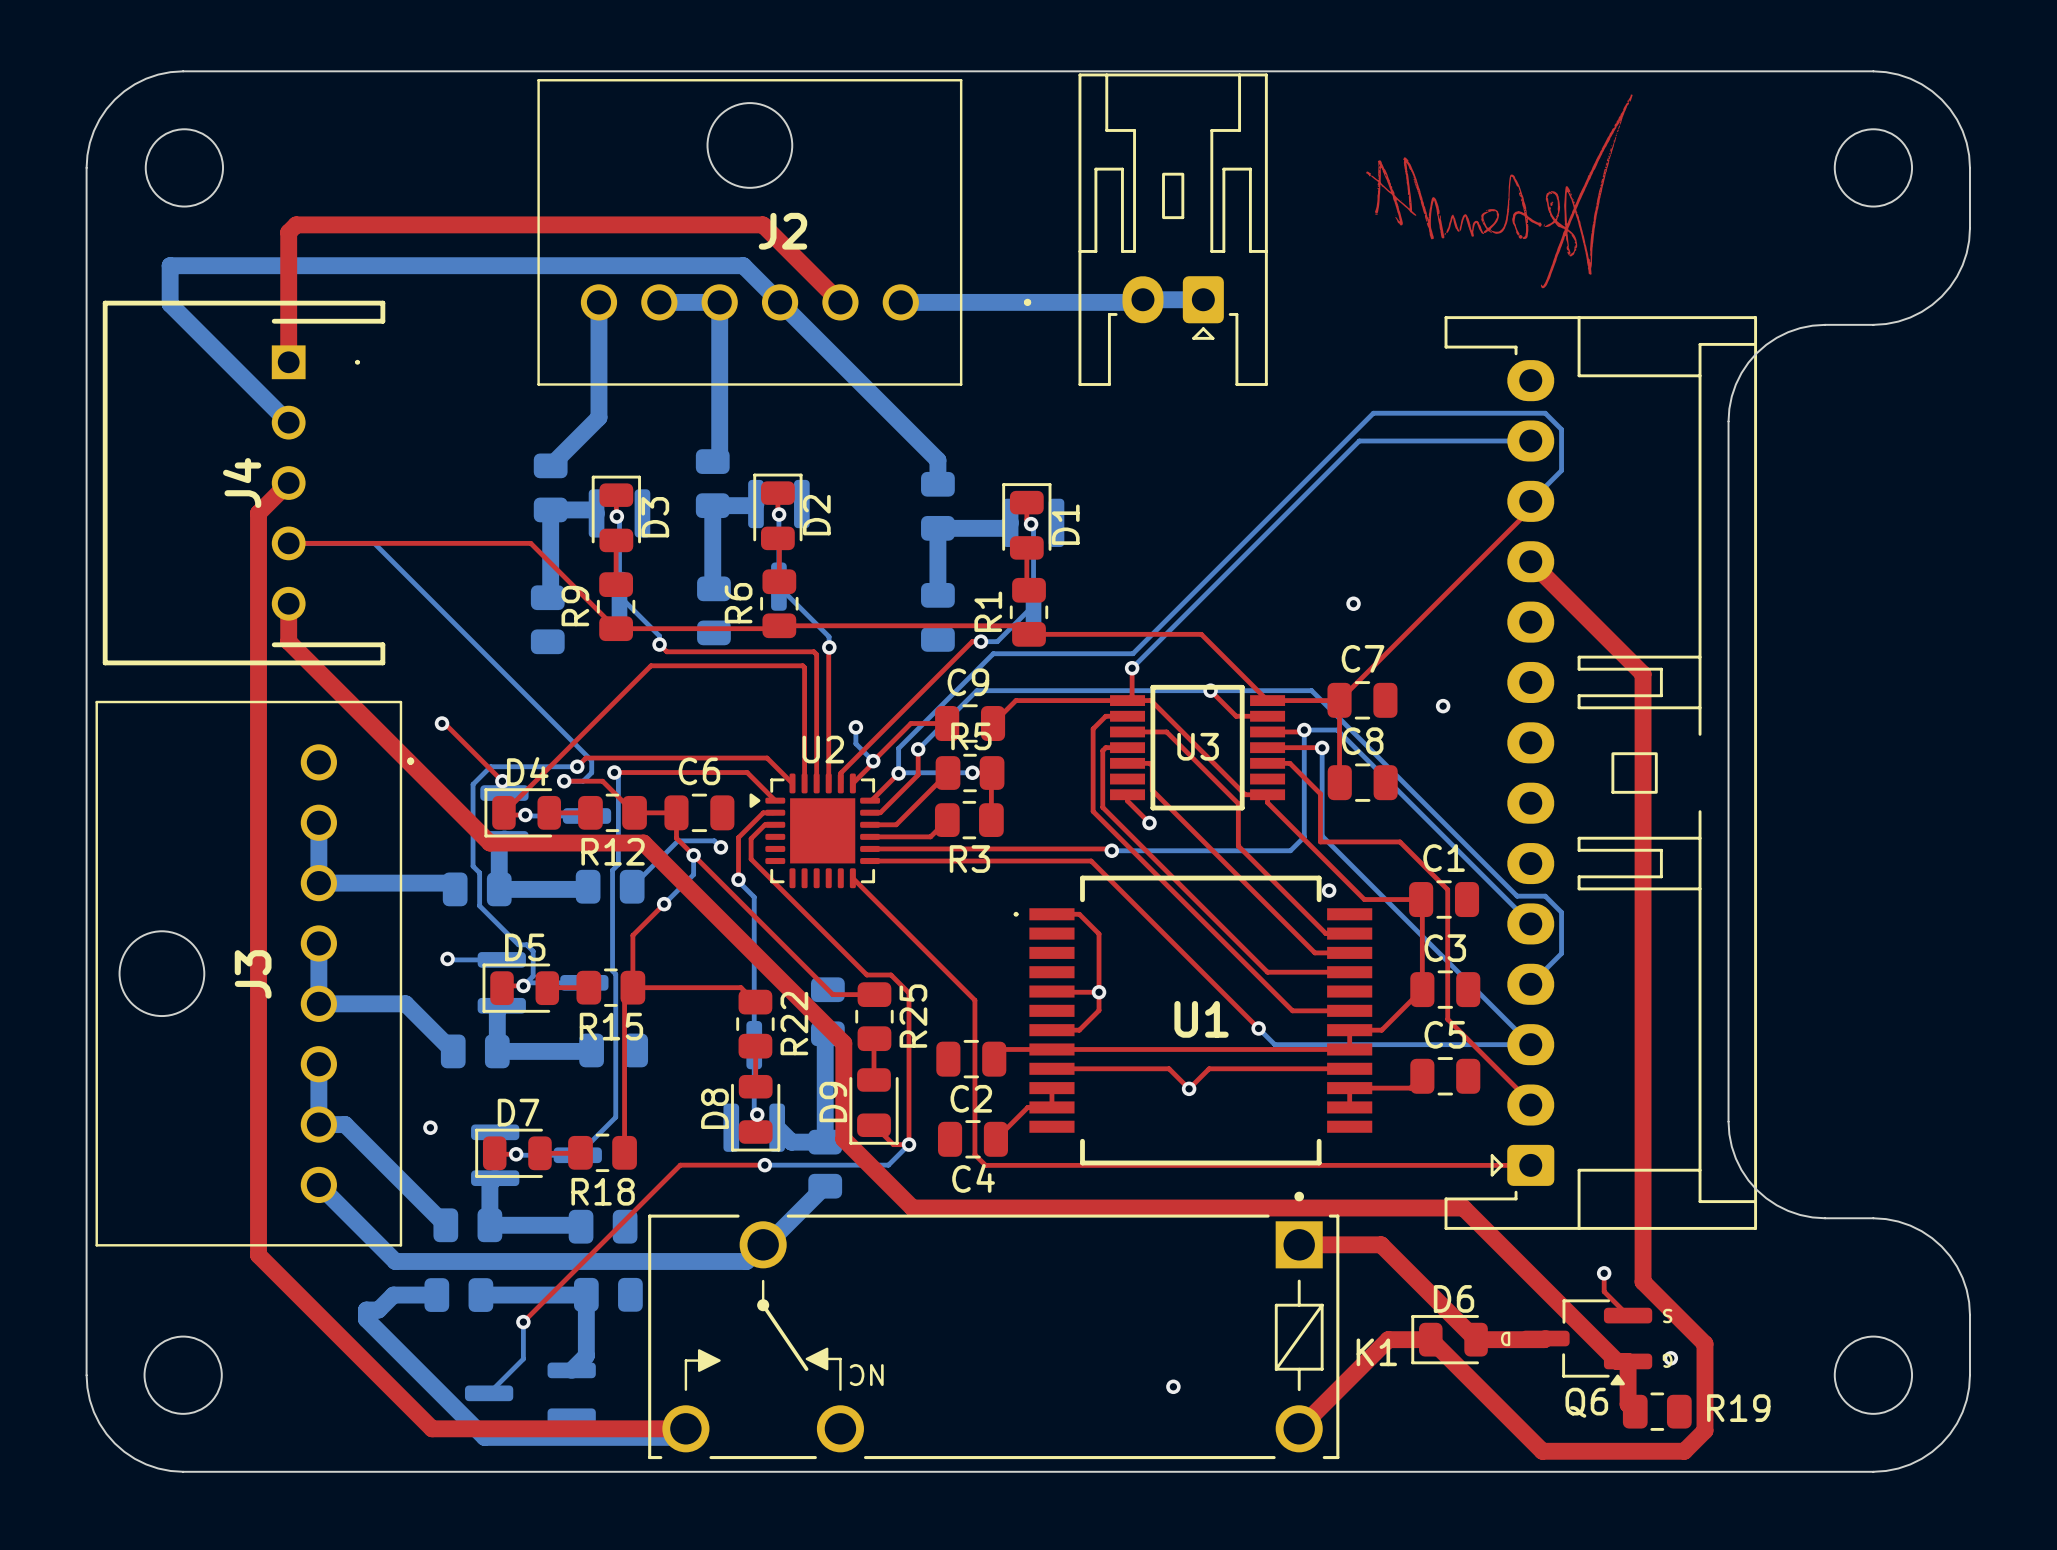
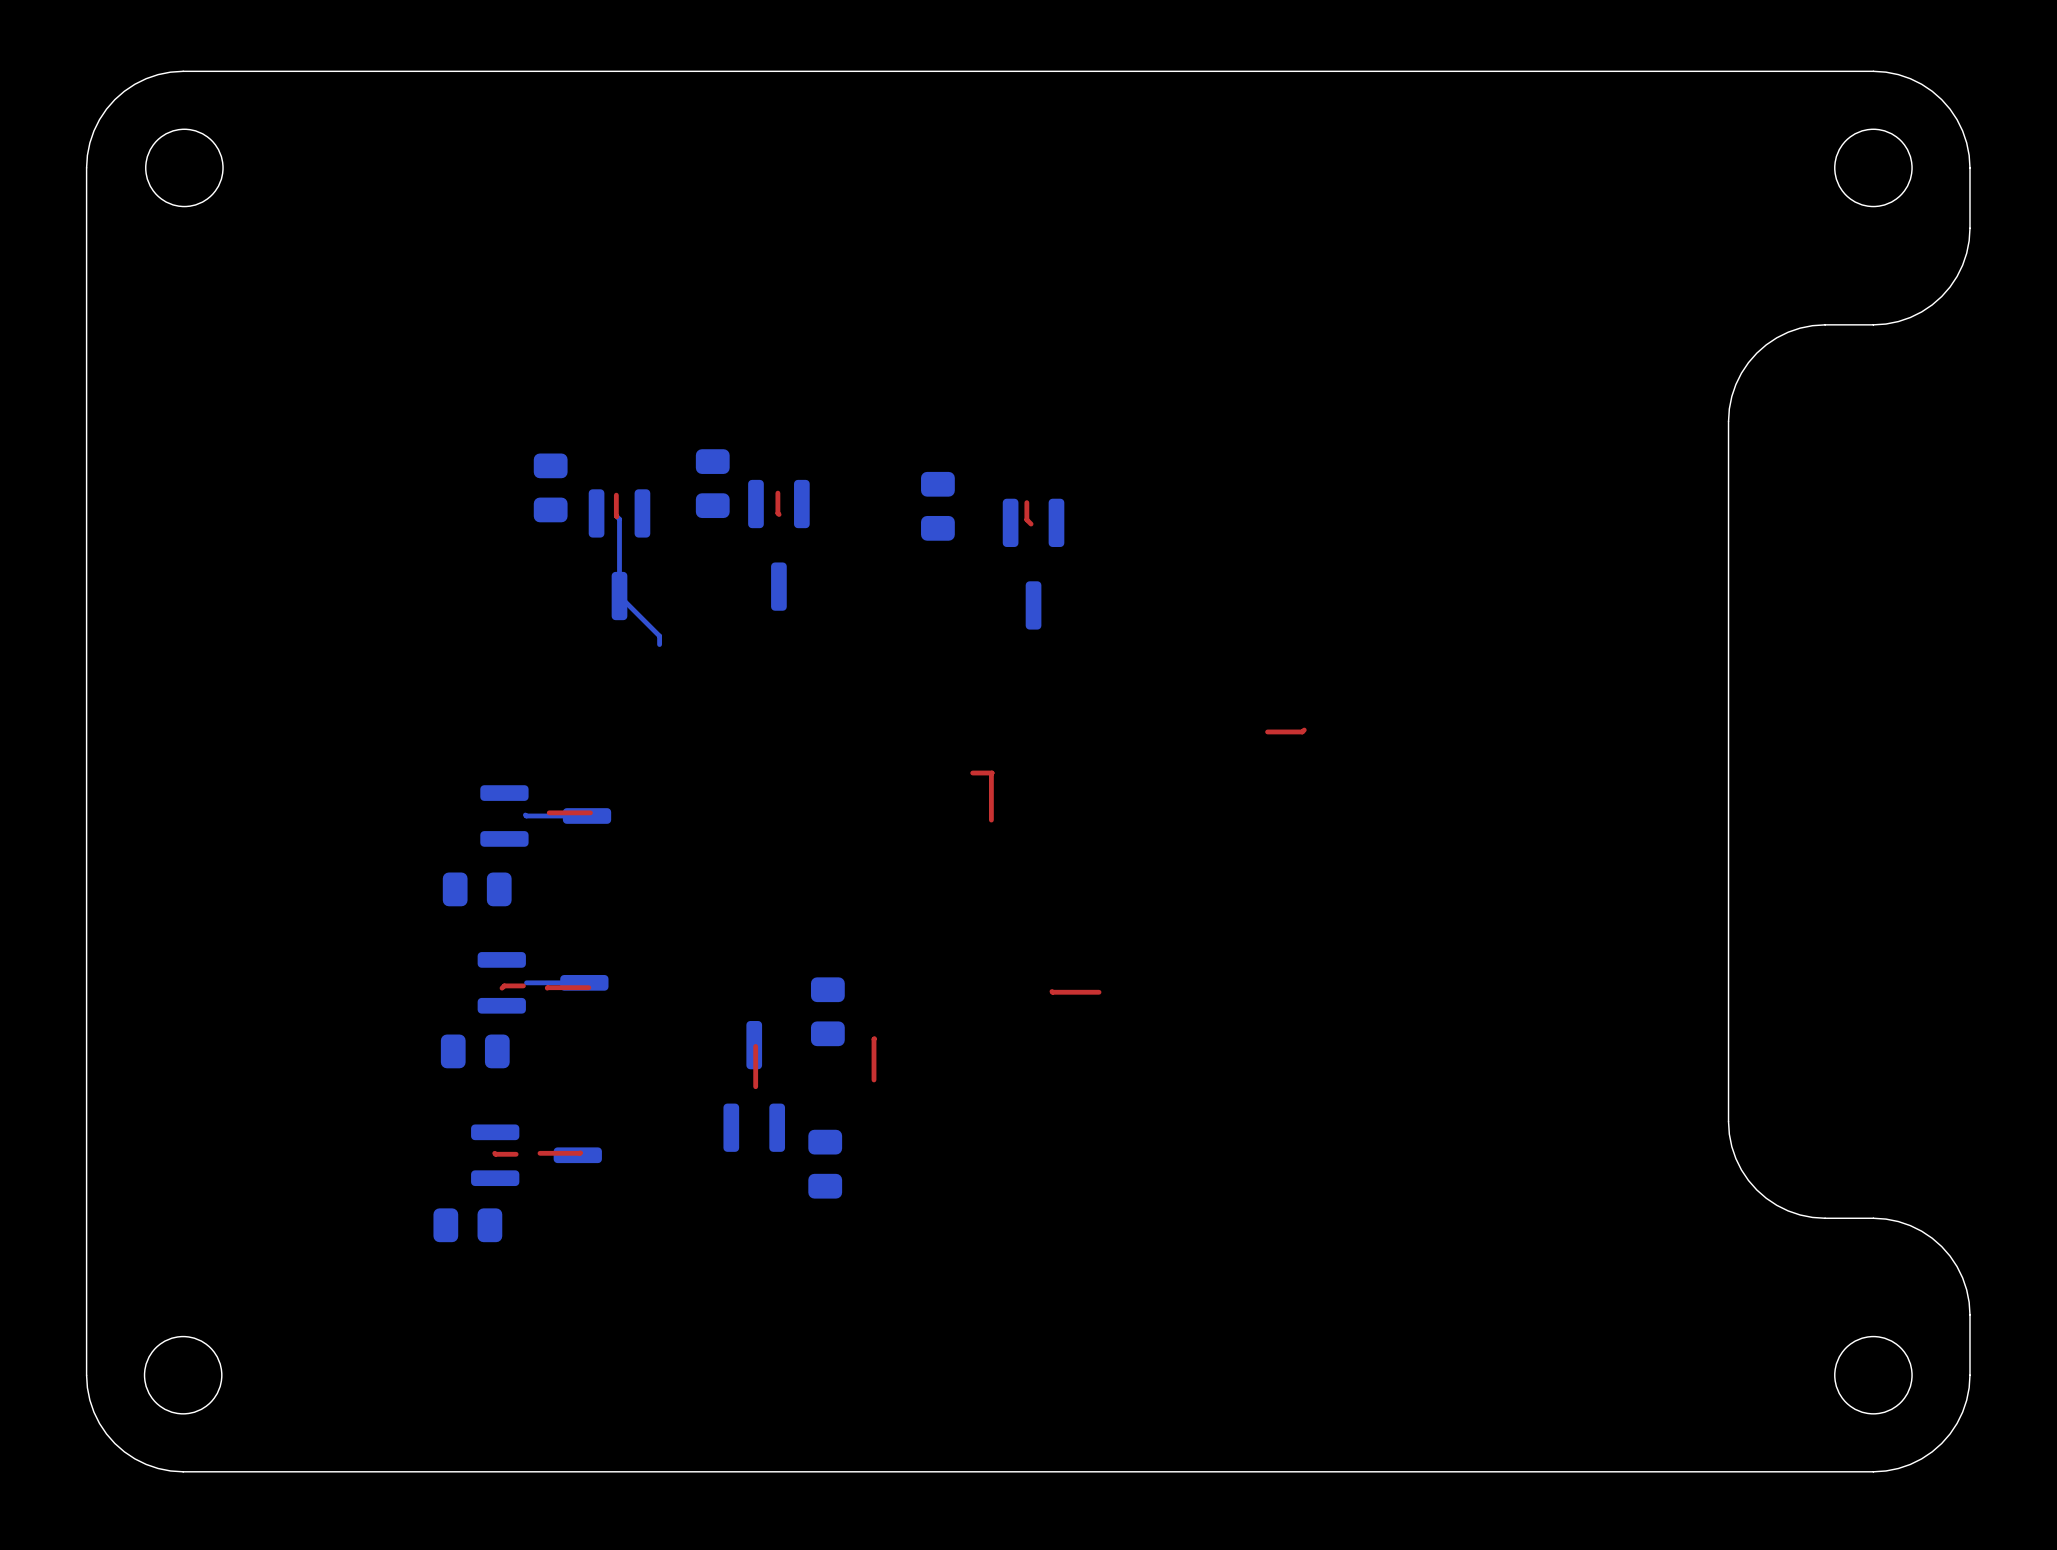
drawing: [1366, 94, 1633, 289] -> none
part: (1173, 229) -> none
J2: (784, 232) -> none
bottom track: (1203, 299) (1142, 299) (1140, 302) (900, 302) -> none
bottom track: (598, 302) (598, 417) (550, 465) -> none
bottom track: (659, 302) (719, 302) (719, 454) (712, 461) -> none
top track: (840, 302) (762, 224) (296, 224) (288, 232) (288, 362) -> none
bottom track: (288, 422) (170, 304) (170, 265) (743, 265) (937, 460) (937, 484) -> none
bottom track: (1530, 441) (1359, 441) (1132, 668) -> none
J4: (244, 483) -> none
top track: (288, 483) (258, 513) (258, 1255) (432, 1428) (685, 1428) -> none
top track: (1530, 501) (1530, 509) (1339, 700) (1267, 700) (1201, 634) (1029, 634) (1020, 625) (779, 625) (776, 628) (616, 628) (530, 543) (288, 543) -> none
bottom track: (1530, 501) (1561, 470) (1561, 429) (1545, 413) (1373, 413) (1132, 653) (993, 653) (898, 748) (898, 773) (972, 772) -> none
bottom track: (755, 504) (754, 505) (712, 505) (713, 588) -> none
D2: (777, 511) -> none
bottom track: (596, 513) (593, 509) (550, 509) (550, 594) (547, 597) -> none
D3: (616, 513) -> none
bottom track: (778, 514) (778, 586) (829, 636) (829, 647) -> none
via: (779, 514) -> none
via: (616, 516) -> none
D1: (1026, 521) -> none
bottom track: (1010, 522) (1005, 528) (937, 528) (937, 595) -> none
bottom track: (1031, 524) (1033, 526) (1033, 605) (997, 641) (980, 641) -> none
via: (1031, 524) -> none
top track: (777, 538) (779, 581) -> none
top track: (616, 540) (616, 584) -> none
bottom track: (288, 543) (374, 543) (591, 760) (591, 772) (583, 781) (564, 781) -> none
top track: (1026, 547) (1026, 588) (1029, 590) -> none
top track: (1530, 561) (1643, 674) (1643, 1281) (1704, 1343) (1704, 1430) (1684, 1451) (1542, 1451) (1430, 1339) (1388, 1339) (1299, 1428) -> none
top track: (288, 603) (288, 641) (489, 843) (643, 843) (843, 1043) (843, 1139) (912, 1208) (1463, 1208) (1617, 1361) (1628, 1361) (1628, 1404) (1635, 1411) -> none
R6: (779, 603) -> none
via: (1353, 603) -> none
R9: (616, 606) -> none
part: (713, 610) -> none
R1: (1029, 612) -> none
part: (937, 617) -> none
part: (547, 619) -> none
top track: (980, 641) (972, 641) (840, 773) (840, 783) -> none
via: (980, 641) -> none
top track: (659, 644) (666, 651) (813, 651) (816, 654) (816, 783) -> none
via: (659, 644) -> none
top track: (829, 647) (828, 783) -> none
via: (829, 647) -> none
top track: (1132, 668) (1132, 695) (1127, 700) -> none
via: (1132, 668) -> none
top track: (1210, 690) (1236, 716) (1267, 716) -> none
via: (1210, 690) -> none
top track: (1339, 700) (1339, 782) -> none
C7: (1362, 700) -> none
via: (1443, 706) -> none
top track: (1127, 716) (1105, 716) (1093, 728) (1093, 811) (1292, 1010) (1349, 1010) -> none
top track: (442, 723) (444, 723) (502, 781) -> none
via: (442, 723) -> none
top track: (947, 723) (910, 723) (852, 783) -> none
C9: (970, 723) -> none
top track: (993, 723) (1015, 700) (1151, 700) (1245, 794) (1267, 794) (1267, 802) (1364, 899) (1422, 900) (1422, 989) (1381, 1030) (1349, 1030) (1349, 1049) (1003, 1049) (994, 1059) -> none
bottom track: (855, 727) (855, 743) (873, 761) -> none
via: (855, 727) -> none
via: (1304, 730) -> none
top track: (1127, 731) (1166, 731) (1238, 803) (1238, 846) (1325, 933) (1349, 933) -> none
top track: (1127, 747) (1105, 747) (1102, 750) (1102, 807) (1267, 972) (1349, 972) -> none
U3: (1197, 747) -> none
top track: (1267, 747) (1321, 747) -> none
bottom track: (1322, 747) (1322, 836) (1530, 1044) (1274, 1044) (1258, 1028) -> none
via: (1322, 747) -> none
top track: (918, 749) (918, 774) (880, 812) (870, 812) -> none
bottom track: (918, 749) (976, 690) (1311, 690) (1517, 896) (1545, 896) (1561, 912) (1561, 953) (1530, 984) -> none
via: (918, 749) -> none
via: (873, 761) -> none
top track: (1127, 763) (1149, 763) (1152, 765) (1152, 790) (1314, 952) (1349, 952) -> none
top track: (1267, 763) (1289, 763) (1320, 793) (1320, 841) (1400, 841) (1447, 889) (1447, 1019) (1530, 1102) (1530, 1105) -> none
top track: (577, 766) (585, 758) (767, 758) (792, 783) -> none
bottom track: (577, 766) (490, 766) (473, 784) (473, 866) (479, 872) (479, 905) (518, 944) (526, 944) (533, 951) (533, 976) (523, 985) -> none
via: (577, 766) -> none
top track: (614, 772) (747, 772) (775, 800) -> none
bottom track: (614, 772) (618, 776) (618, 864) (612, 870) (612, 970) (615, 974) (615, 1117) (577, 1155) (516, 1154) -> none
via: (614, 772) -> none
via: (972, 772) -> none
top track: (898, 773) (870, 800) -> none
via: (898, 773) -> none
top track: (948, 773) (896, 824) (870, 824) -> none
R5: (970, 773) -> none
part: (1600, 773) -> none
via: (502, 781) -> none
top track: (564, 781) (602, 781) (634, 812) (676, 812) (676, 838) (832, 994) (874, 994) -> none
via: (564, 781) -> none
C8: (1362, 782) -> none
top track: (804, 783) (804, 667) (802, 665) (651, 665) (503, 812) (506, 815) (525, 815) -> none
top track: (1127, 794) (1127, 801) (1149, 822) -> none
D4: (522, 812) -> none
R12: (612, 812) -> none
C6: (699, 812) -> none
top track: (775, 812) (763, 812) (738, 837) (738, 879) -> none
via: (525, 815) -> none
top track: (947, 820) (930, 836) (870, 836) -> none
R3: (969, 820) -> none
bottom track: (318, 822) (318, 883) (448, 883) (455, 889) -> none
via: (1149, 822) -> none
top track: (775, 824) (764, 824) (751, 838) (751, 859) (866, 974) (891, 974) (909, 992) (909, 1144) (893, 1144) (873, 1125) -> none
U2: (814, 830) -> none
bottom track: (504, 838) (499, 844) (499, 889) (585, 889) (588, 886) -> none
bottom track: (720, 847) (714, 840) (678, 840) (632, 886) -> none
via: (720, 847) -> none
top track: (870, 848) (1110, 848) (1111, 850) -> none
bottom track: (1111, 850) (1290, 850) (1304, 837) (1304, 730) (1337, 730) (1530, 923) -> none
via: (1111, 850) -> none
bottom track: (693, 855) (693, 874) (664, 904) -> none
via: (693, 855) -> none
top track: (870, 861) (1091, 861) (1258, 1028) -> none
top track: (852, 878) (974, 1000) (974, 1154) (985, 1165) (1530, 1165) -> none
bottom track: (738, 879) (754, 897) (754, 1111) (757, 1114) -> none
via: (738, 879) -> none
part: (610, 886) -> none
via: (1329, 890) -> none
C1: (1444, 899) -> none
top track: (664, 904) (632, 935) (632, 987) -> none
via: (664, 904) -> none
top track: (1051, 914) (1079, 914) (1099, 933) (1099, 1010) (1079, 1030) (1051, 1030) -> none
bottom track: (318, 943) (318, 1003) (405, 1003) (453, 1051) -> none
bottom track: (447, 958) (501, 959) -> none
via: (447, 958) -> none
J3: (254, 973) -> none
via: (523, 985) -> none
R15: (610, 987) -> none
top track: (632, 987) (624, 996) (624, 1152) -> none
top track: (632, 987) (741, 987) (755, 1002) -> none
D5: (520, 988) -> none
C3: (1445, 989) -> none
via: (1099, 992) -> none
bottom track: (501, 1005) (497, 1010) (497, 1051) (591, 1050) -> none
R25: (874, 1016) -> none
U1: (1192, 1020) -> none
R22: (755, 1024) -> none
via: (1258, 1028) -> none
bottom track: (827, 1033) (825, 1036) (825, 1142) (791, 1142) (777, 1127) -> none
part: (613, 1050) -> none
C2: (971, 1059) -> none
bottom track: (318, 1064) (318, 1124) (345, 1124) (445, 1225) -> none
top track: (1051, 1068) (1169, 1068) (1189, 1088) (1209, 1068) (1349, 1068) -> none
top track: (1422, 1076) (1410, 1088) (1349, 1088) (1349, 1107) -> none
C5: (1445, 1076) -> none
top track: (1051, 1088) (1051, 1107) (1027, 1107) (995, 1139) -> none
via: (1189, 1088) -> none
D9: (873, 1106) -> none
D8: (755, 1113) -> none
via: (757, 1114) -> none
via: (430, 1127) -> none
C4: (972, 1139) -> none
bottom track: (909, 1144) (888, 1165) (764, 1165) -> none
via: (909, 1144) -> none
R18: (602, 1152) -> none
D7: (513, 1153) -> none
via: (516, 1154) -> none
top track: (764, 1165) (680, 1165) (523, 1322) -> none
via: (764, 1165) -> none
bottom track: (495, 1178) (489, 1183) (489, 1225) (581, 1226) -> none
bottom track: (318, 1184) (395, 1261) (746, 1261) (763, 1244) (766, 1244) (825, 1186) -> none
part: (603, 1226) -> none
top track: (1299, 1244) (1381, 1244) (1476, 1339) (1545, 1338) -> none
top track: (1604, 1273) (1604, 1291) (1628, 1315) -> none
via: (1604, 1273) -> none
bottom track: (586, 1294) (586, 1355) (571, 1370) -> none
part: (608, 1294) -> none
bottom track: (436, 1295) (393, 1295) (378, 1310) (366, 1310) (366, 1319) (484, 1437) (677, 1437) (685, 1428) -> none
part: (458, 1295) -> none
bottom track: (480, 1295) (586, 1295) -> none
bottom track: (523, 1322) (523, 1359) (489, 1393) -> none
via: (523, 1322) -> none
K1: (993, 1325) -> none
D6: (1449, 1339) -> none
Q6: (1586, 1342) -> none
via: (1670, 1358) -> none
via: (1173, 1386) -> none
part: (530, 1393) -> none
R19: (1657, 1411) -> none

